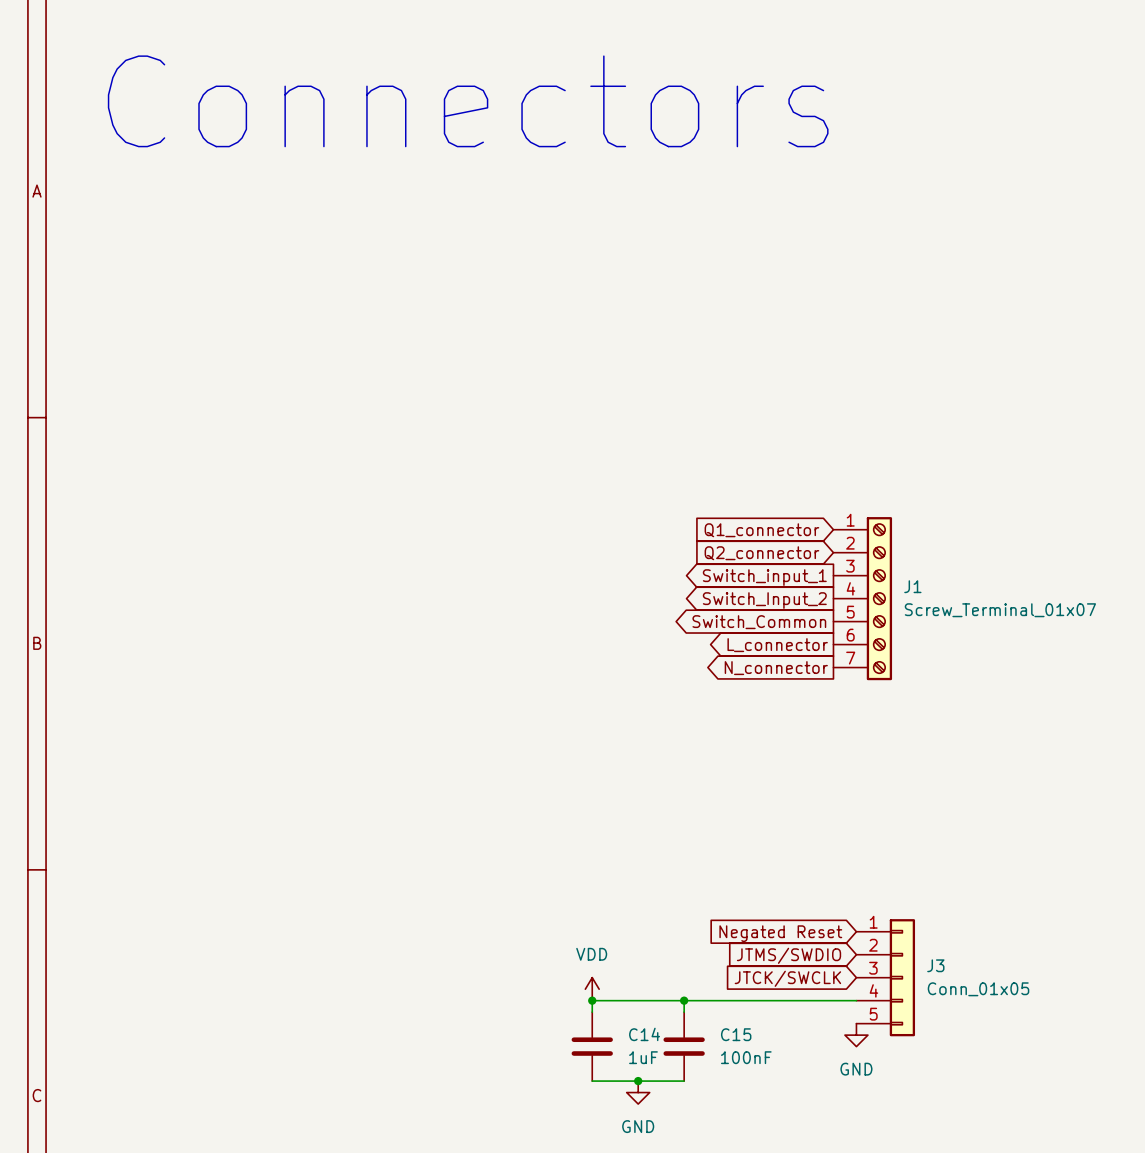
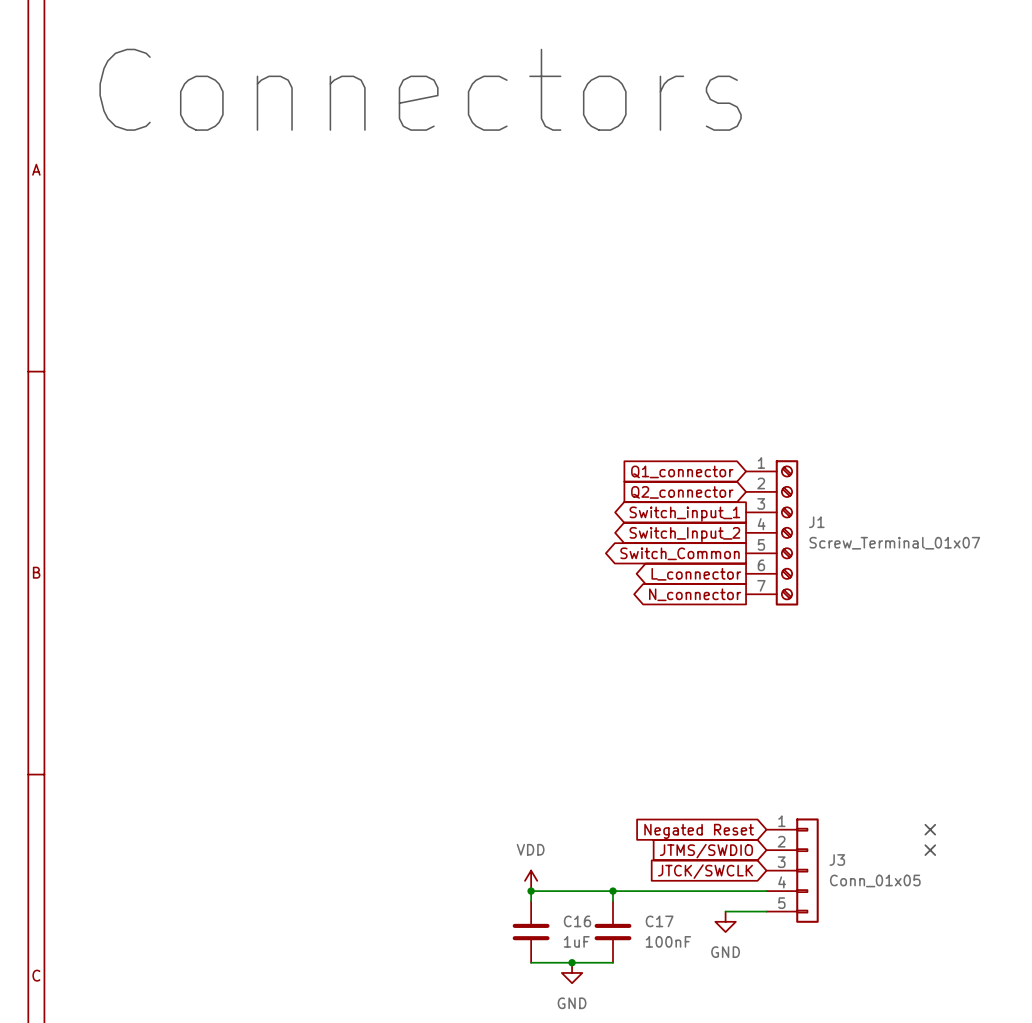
no-connect mark: none -> (930, 829)
no-connect mark: none -> (930, 850)
wire: none -> (725, 911) (766, 911)
C14 name: C14 (644, 1034) -> C16 (577, 921)
C15 name: C15 (736, 1034) -> C17 (659, 921)
power symbol position: GND (856, 1035) -> GND (725, 921)

